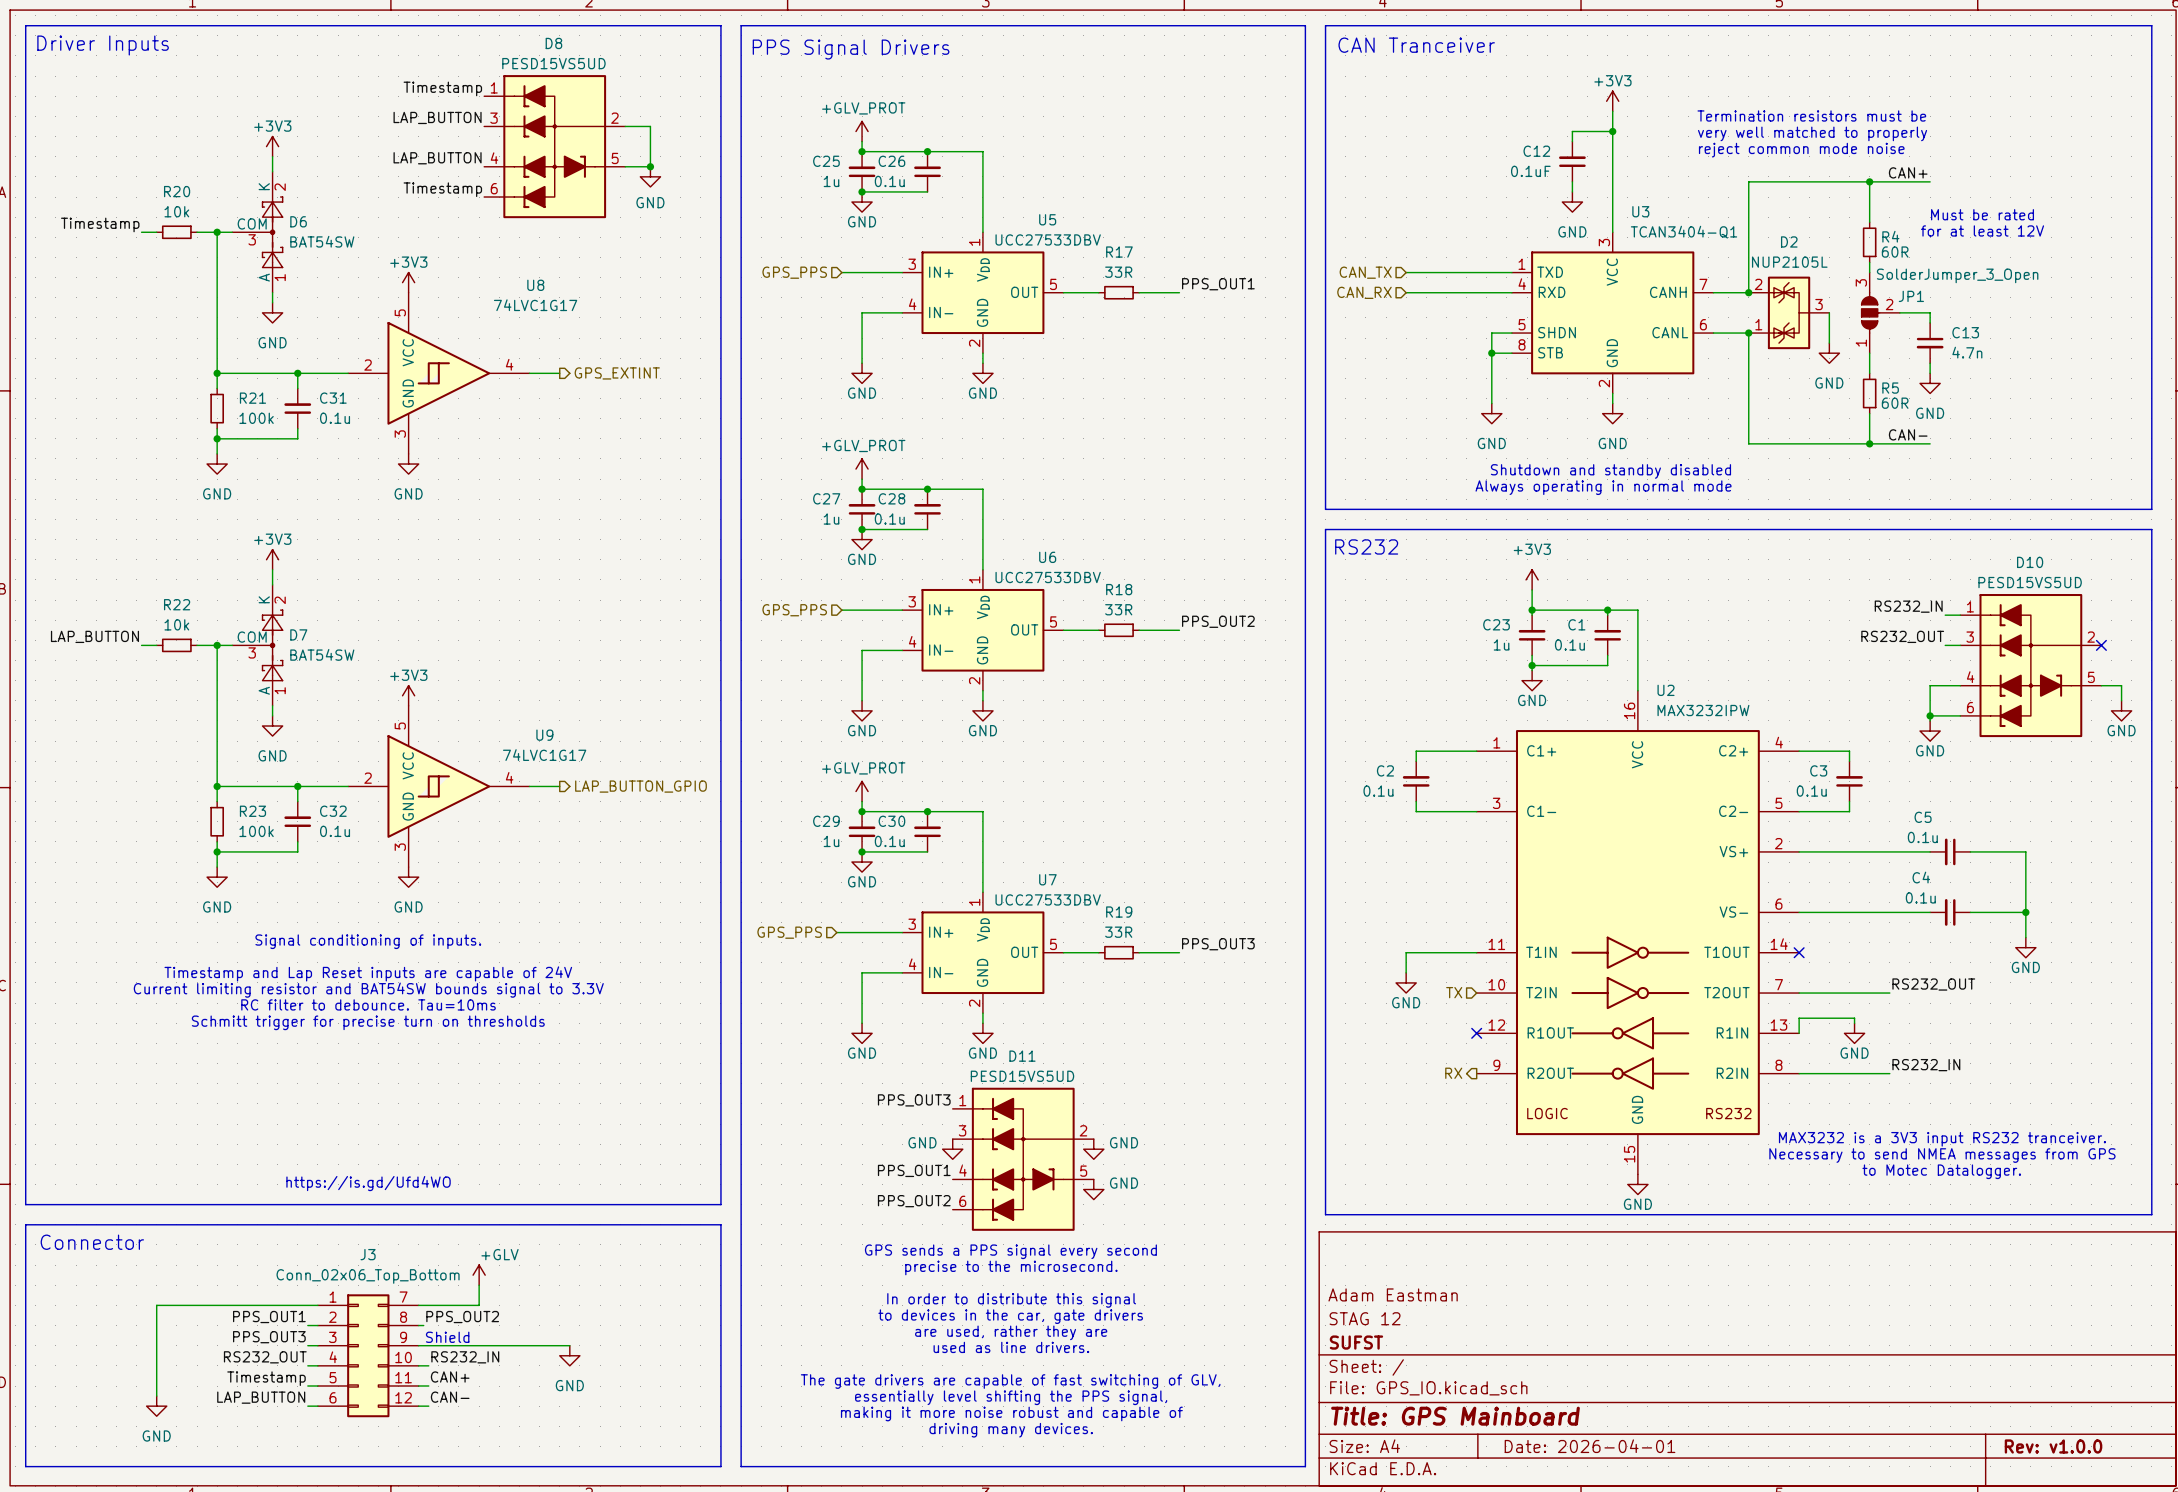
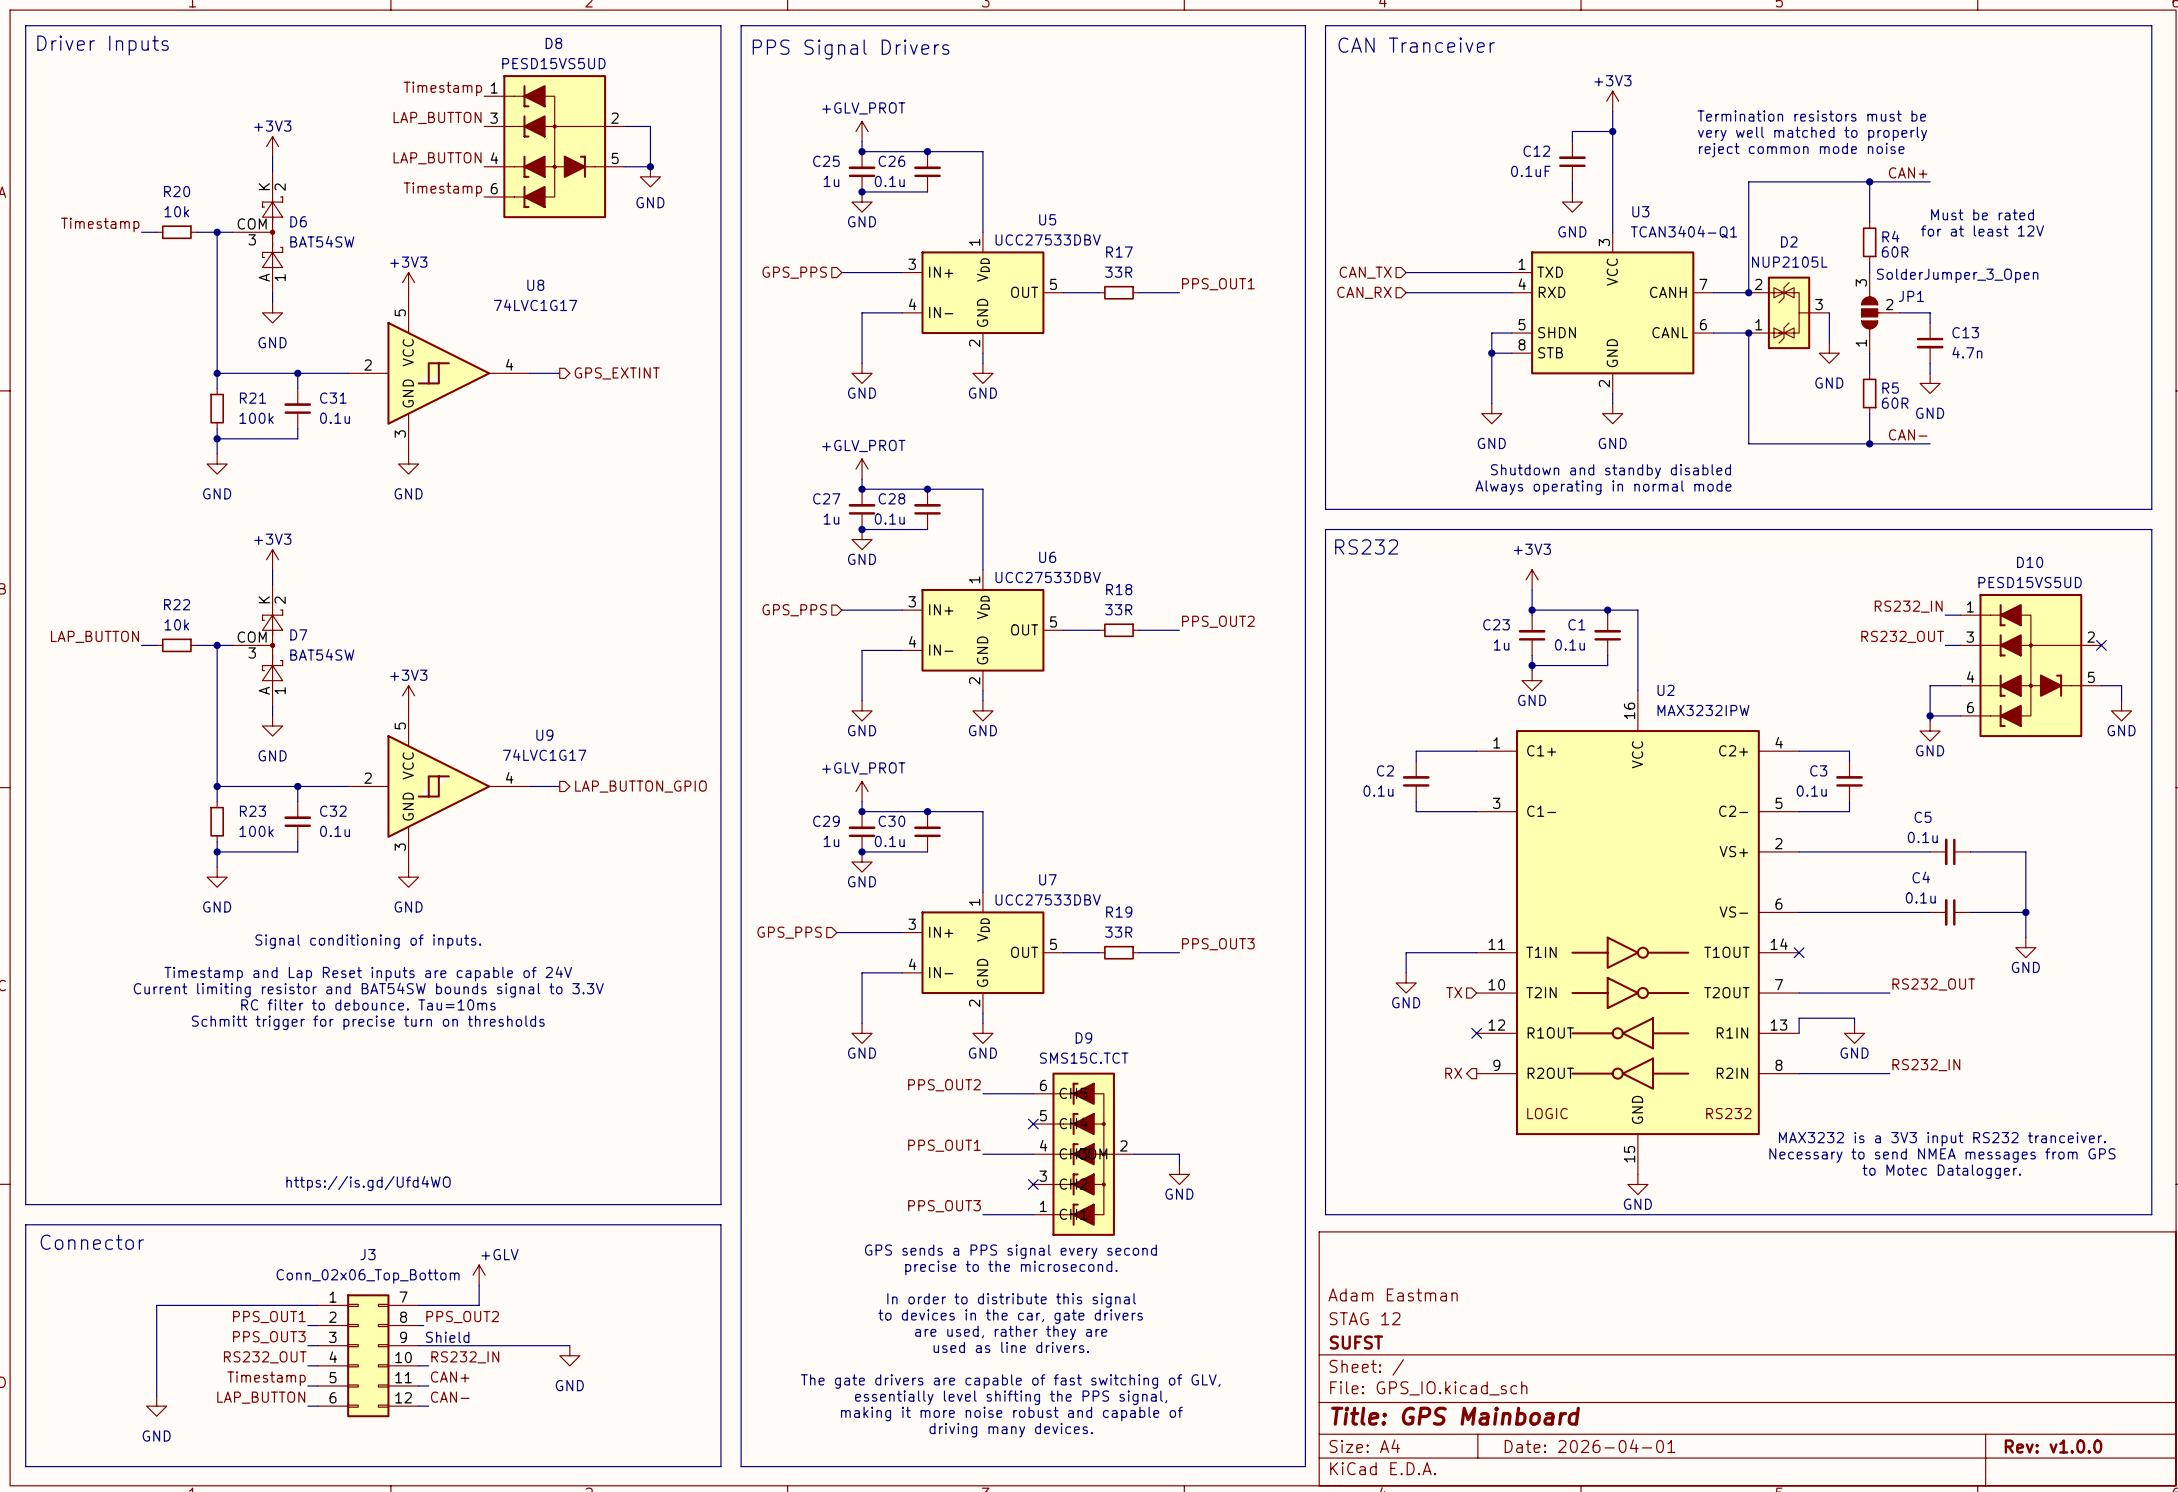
label position: PPS_OUT3 (914, 1100) -> PPS_OUT3 (944, 1206)
no-connect mark: none -> (1033, 1124)
power symbol: GND (952, 1149) -> none
power symbol: GND (1093, 1149) -> none
D9: none -> SMS15C.TCT (1083, 1154)
wire: none -> (1134, 1154) (1179, 1154) (1179, 1164)
D11: PESD15VS5UD (1023, 1159) -> none
label position: PPS_OUT1 (914, 1170) -> PPS_OUT1 (944, 1145)
power symbol: none -> GND (1179, 1174)
no-connect mark: none -> (1033, 1184)
power symbol: GND (1093, 1189) -> none
label position: PPS_OUT2 (914, 1201) -> PPS_OUT2 (944, 1085)

